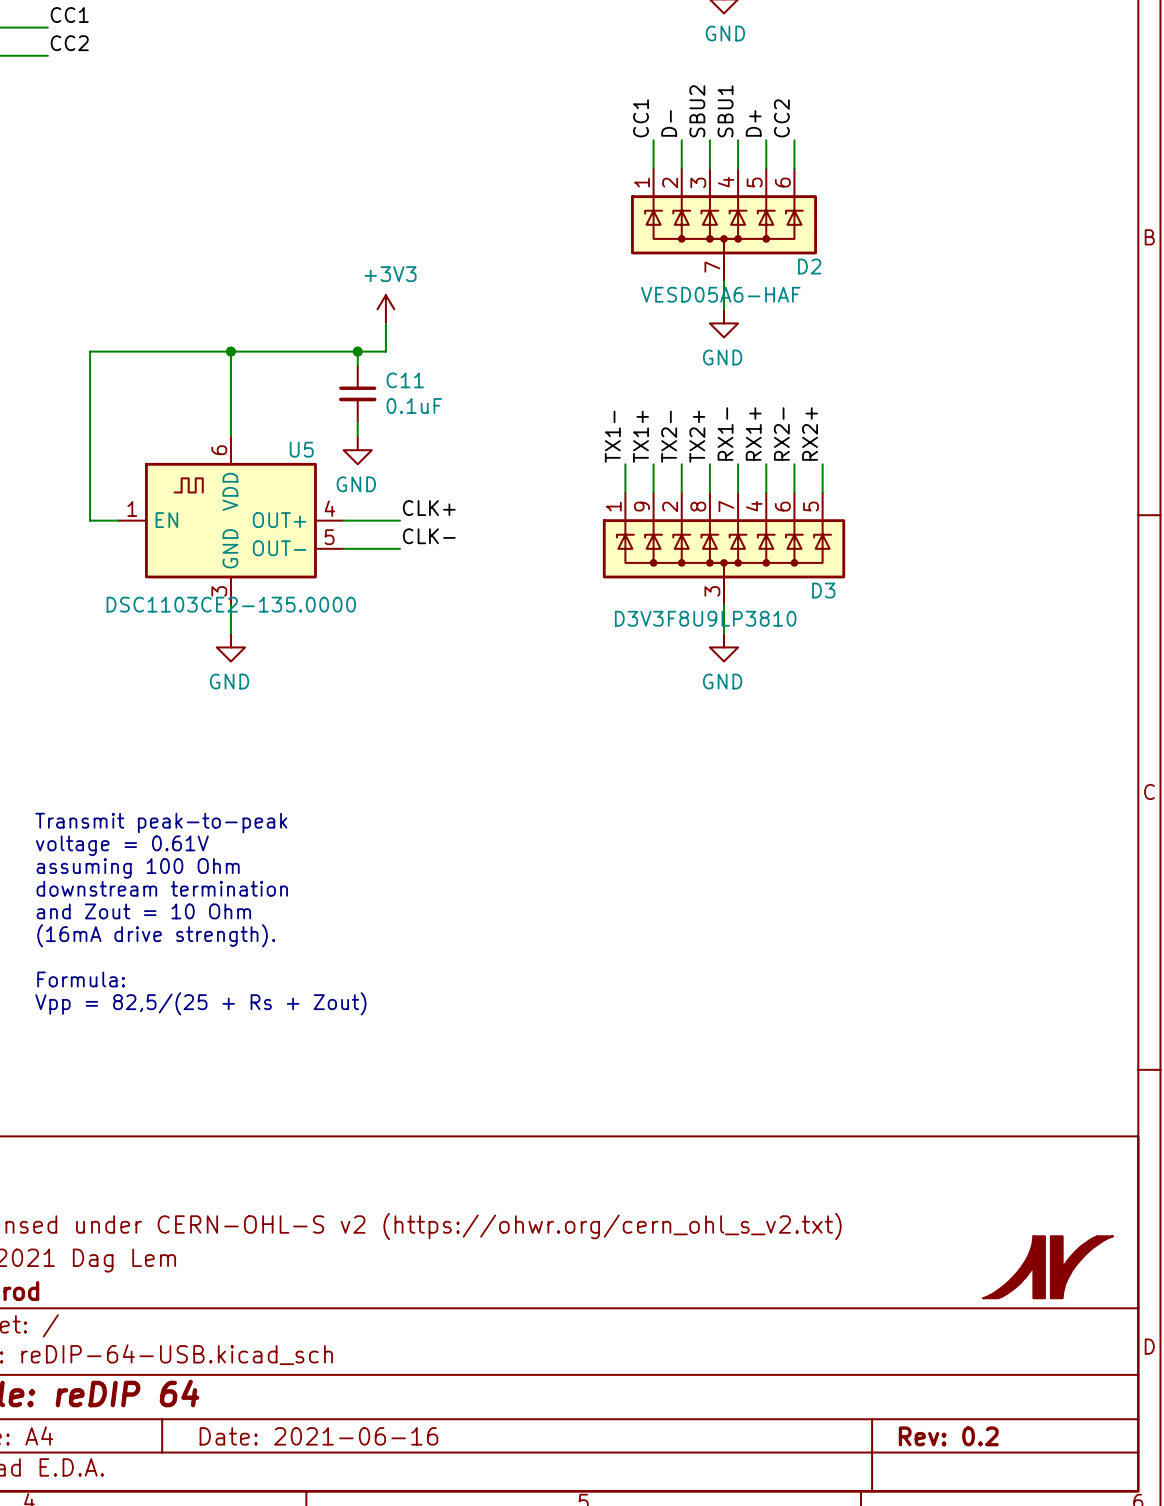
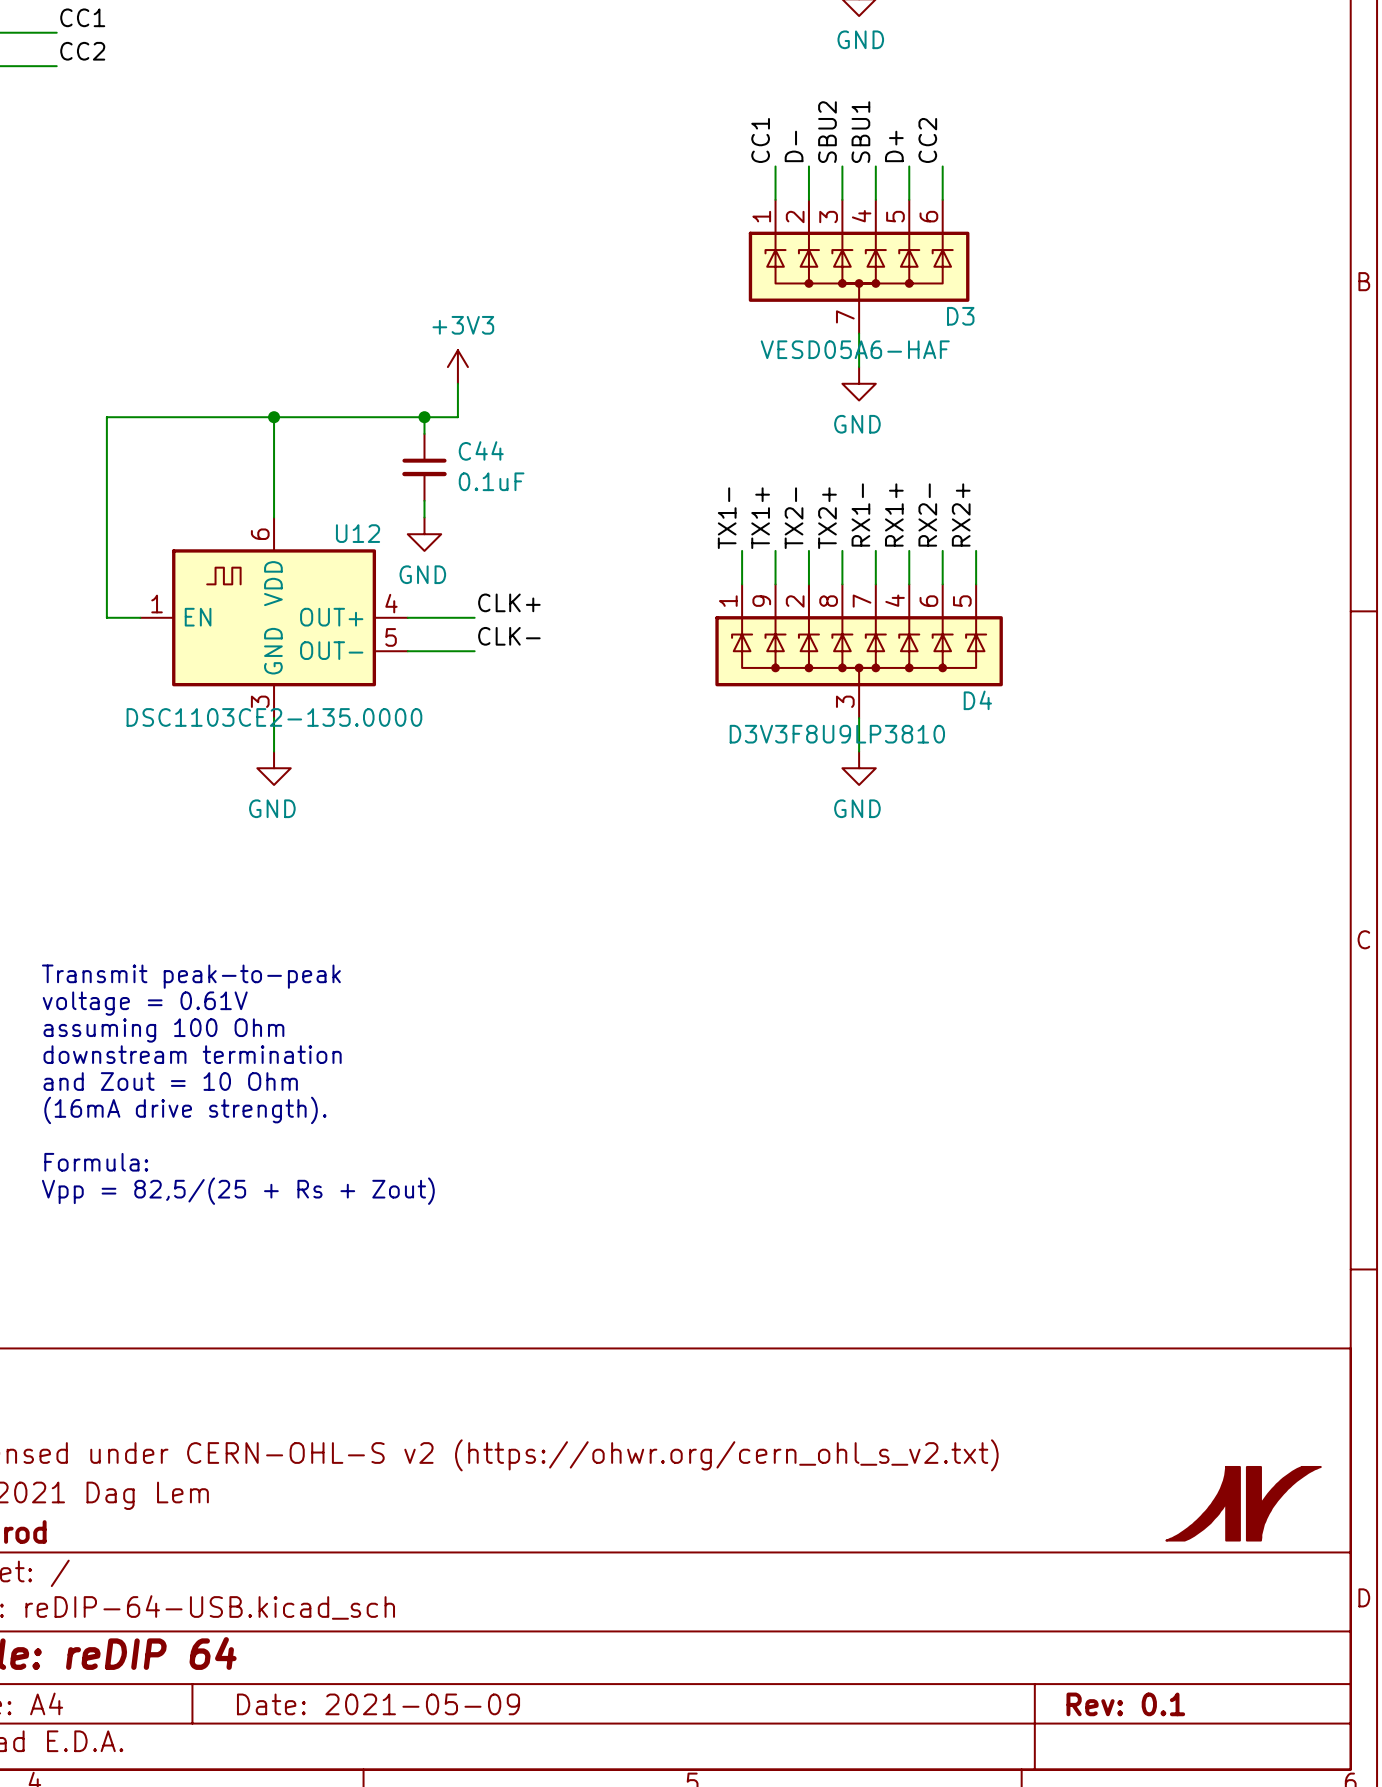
D2 name: D2 (809, 266) -> D3 (960, 316)
C11 name: C11 (405, 380) -> C44 (481, 450)
U5 name: U5 (301, 449) -> U12 (358, 533)
D3 name: D3 (823, 590) -> D4 (977, 700)
title block: Date: 2021-06-16 (318, 1436) -> Date: 2021-05-09 (378, 1704)
title block: Rev: 0.2 (948, 1436) -> Rev: 0.1 (1125, 1704)

